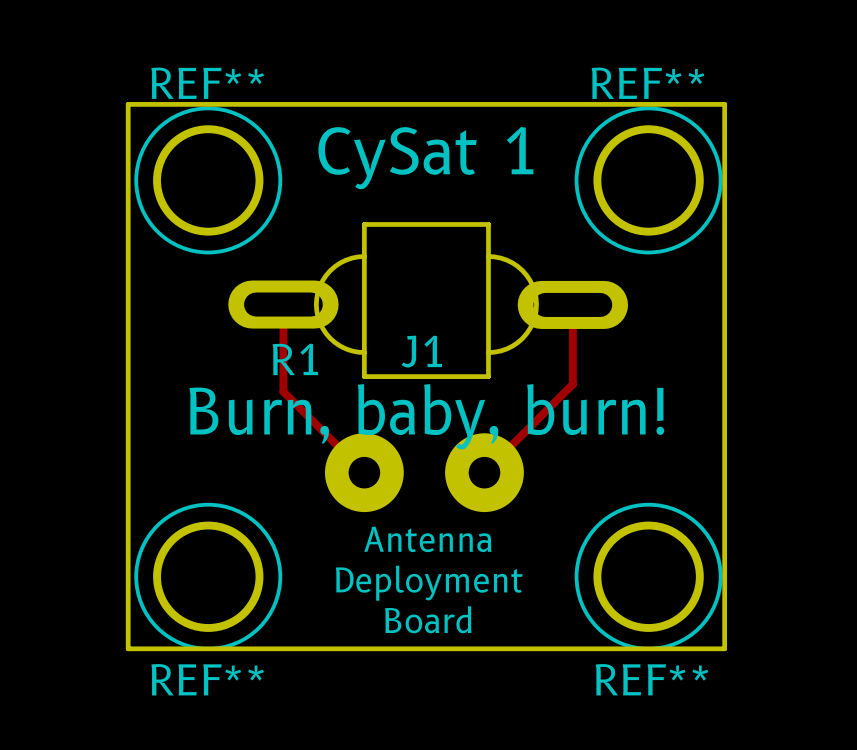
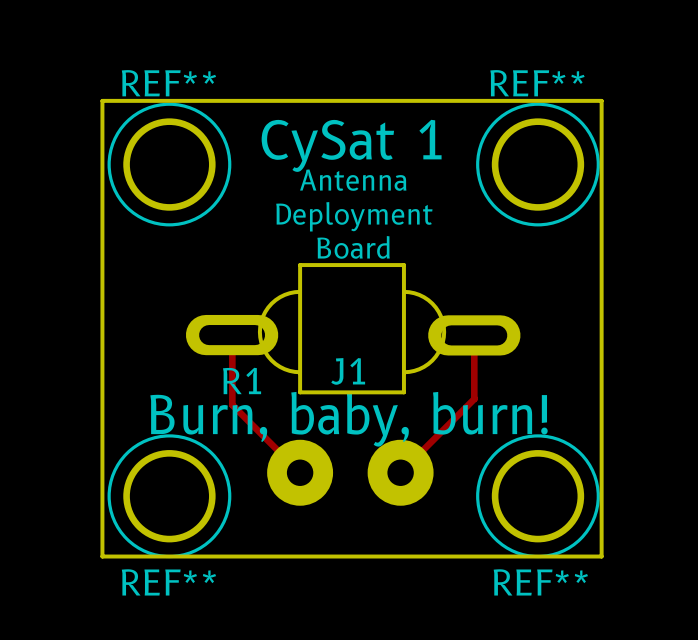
board edge: (364, 256) (345, 260) (330, 270) (320, 286) (316, 304) (320, 322) (330, 338) (345, 348) (364, 352) -> (300, 291) (284, 294) (271, 303) (262, 316) (259, 332) (262, 347) (271, 360) (284, 369) (300, 372)
board edge: (488, 256) (506, 260) (522, 270) (532, 286) (536, 304) (532, 322) (522, 338) (506, 348) (488, 352) -> (403, 291) (419, 294) (432, 303) (441, 316) (444, 332) (441, 347) (432, 360) (419, 369) (403, 372)
board edge: (364, 300) (364, 224) (488, 224) (488, 300) -> (300, 265) (403, 265)
track: (283, 304) (283, 380) -> none
R1 position: (428, 304) -> (353, 335)
track: (572, 304) (572, 384) (484, 472) -> none
board edge: (364, 376) (488, 376) -> (300, 328) (300, 392) (403, 392) (403, 328)
track: none -> (474, 335) (474, 398)
track: (283, 391) (364, 472) -> (232, 341) (232, 405) (300, 472)
text position: Burn, baby, burn! (426, 416) -> Burn, baby, burn! (349, 419)
track: none -> (474, 398) (400, 472)
J1 position: (424, 472) -> (350, 472)
text position: Antenna (427, 539) -> Antenna (353, 180)
text position: Deployment (429, 583) -> Deployment (354, 216)
text position: Board (428, 619) -> Board (353, 247)

